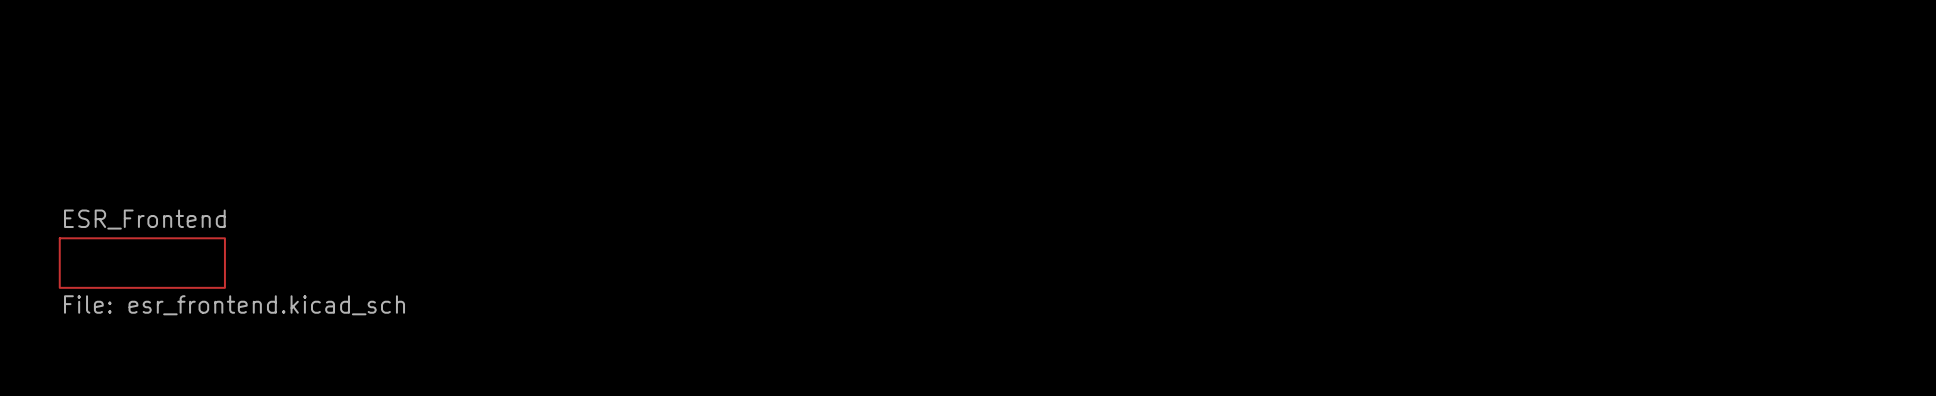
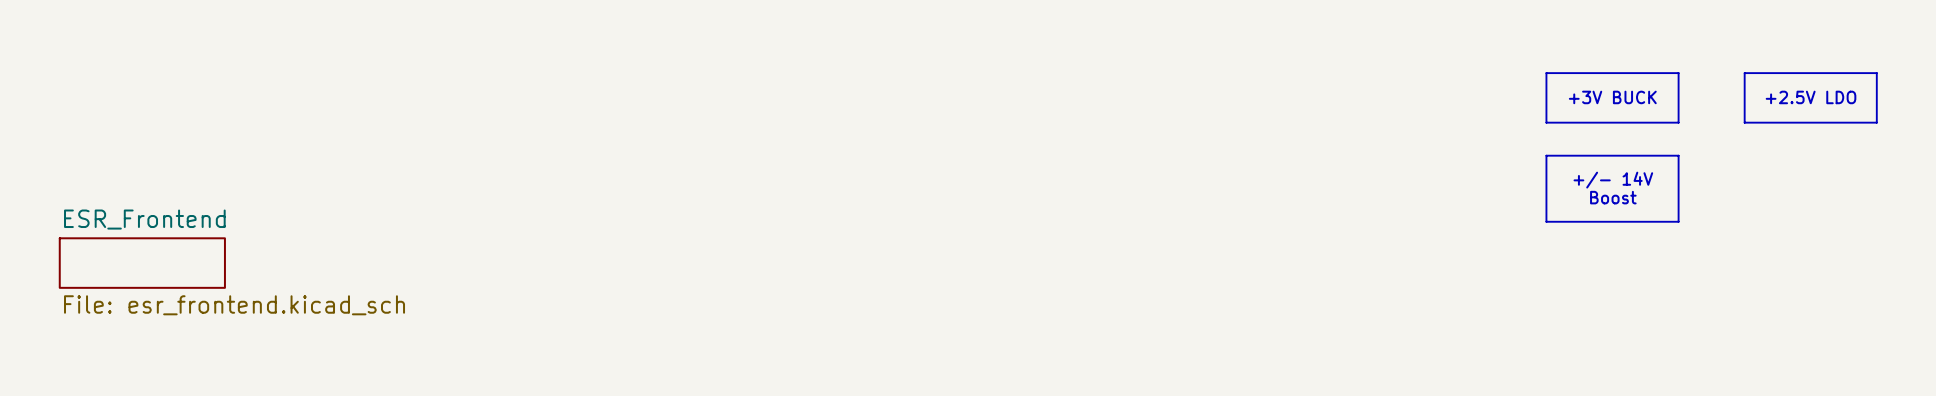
line: none -> (1546, 73) (1546, 122) (1678, 122) (1678, 73) (1546, 73)
line: none -> (1744, 73) (1876, 73) (1876, 122) (1744, 122) (1744, 73)
text: none -> +3V BUCK (1612, 97)
text: none -> +2.5V LDO (1811, 97)
line: none -> (1546, 155) (1678, 155) (1678, 221) (1546, 221) (1546, 155)
text: none -> +/- 14V (1613, 180)
text: none -> Boost (1613, 197)

